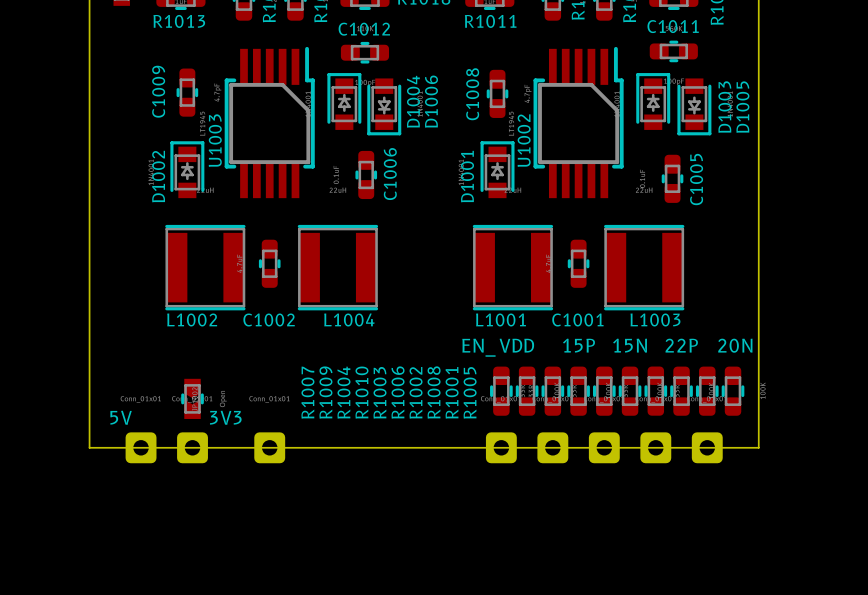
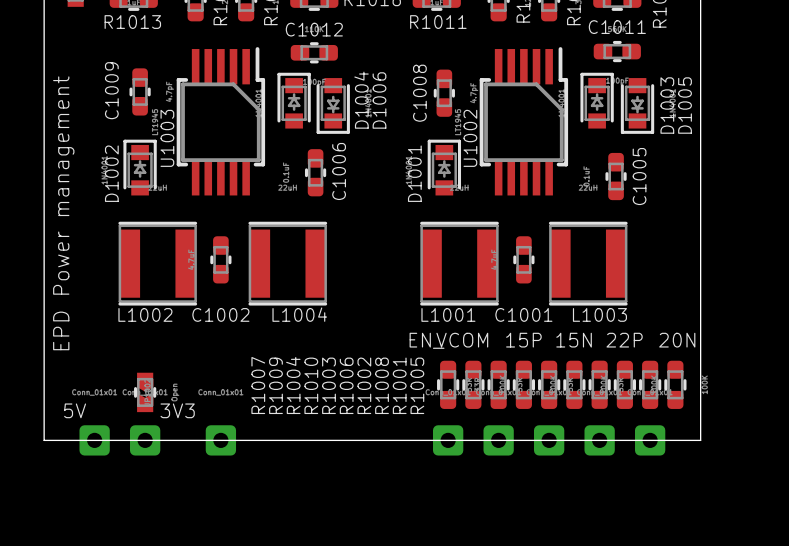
text: none -> EPD Power management (63, 213)
text: VDD (516, 345) -> VCOM (462, 340)

